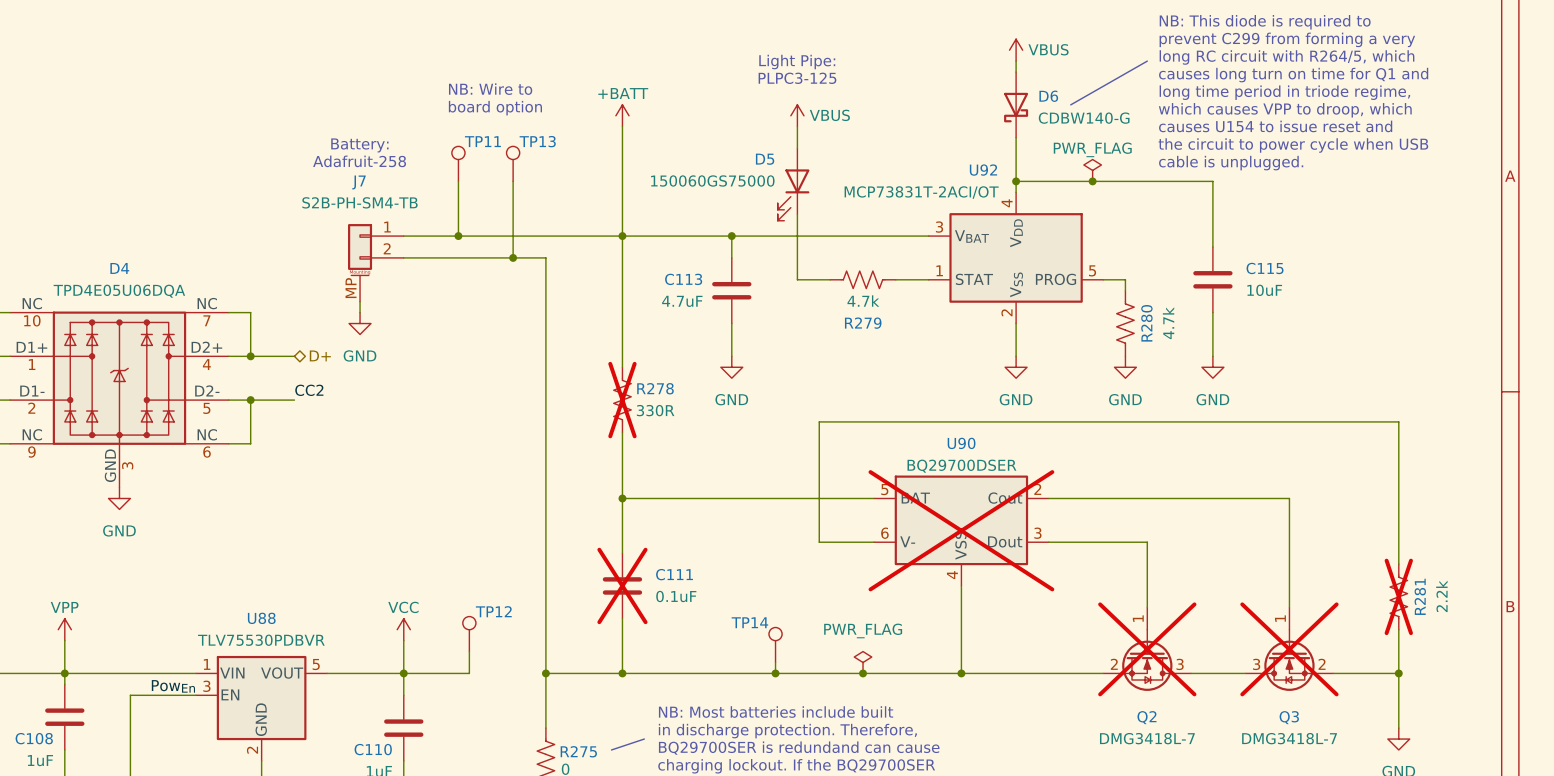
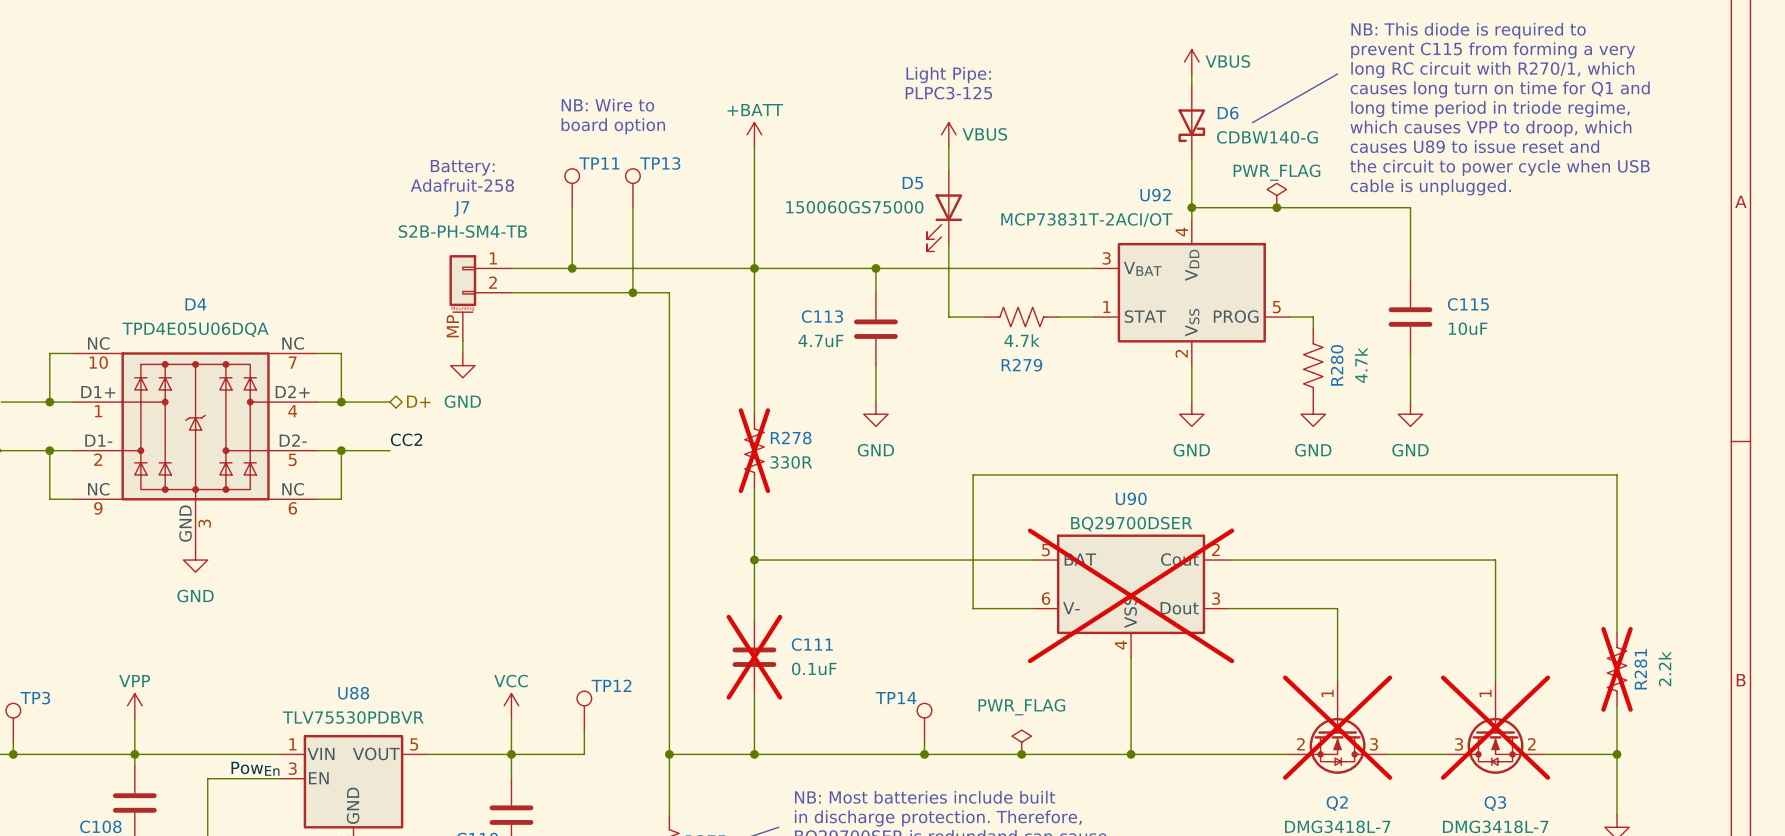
text: prevent C299 from forming a very (1287, 39) -> prevent C115 from forming a very (1493, 50)
text: long RC circuit with R264/5, which (1287, 57) -> long RC circuit with R270/1, which (1492, 70)
text: causes U154 to issue reset and (1275, 126) -> causes U89 to issue reset and (1474, 146)

